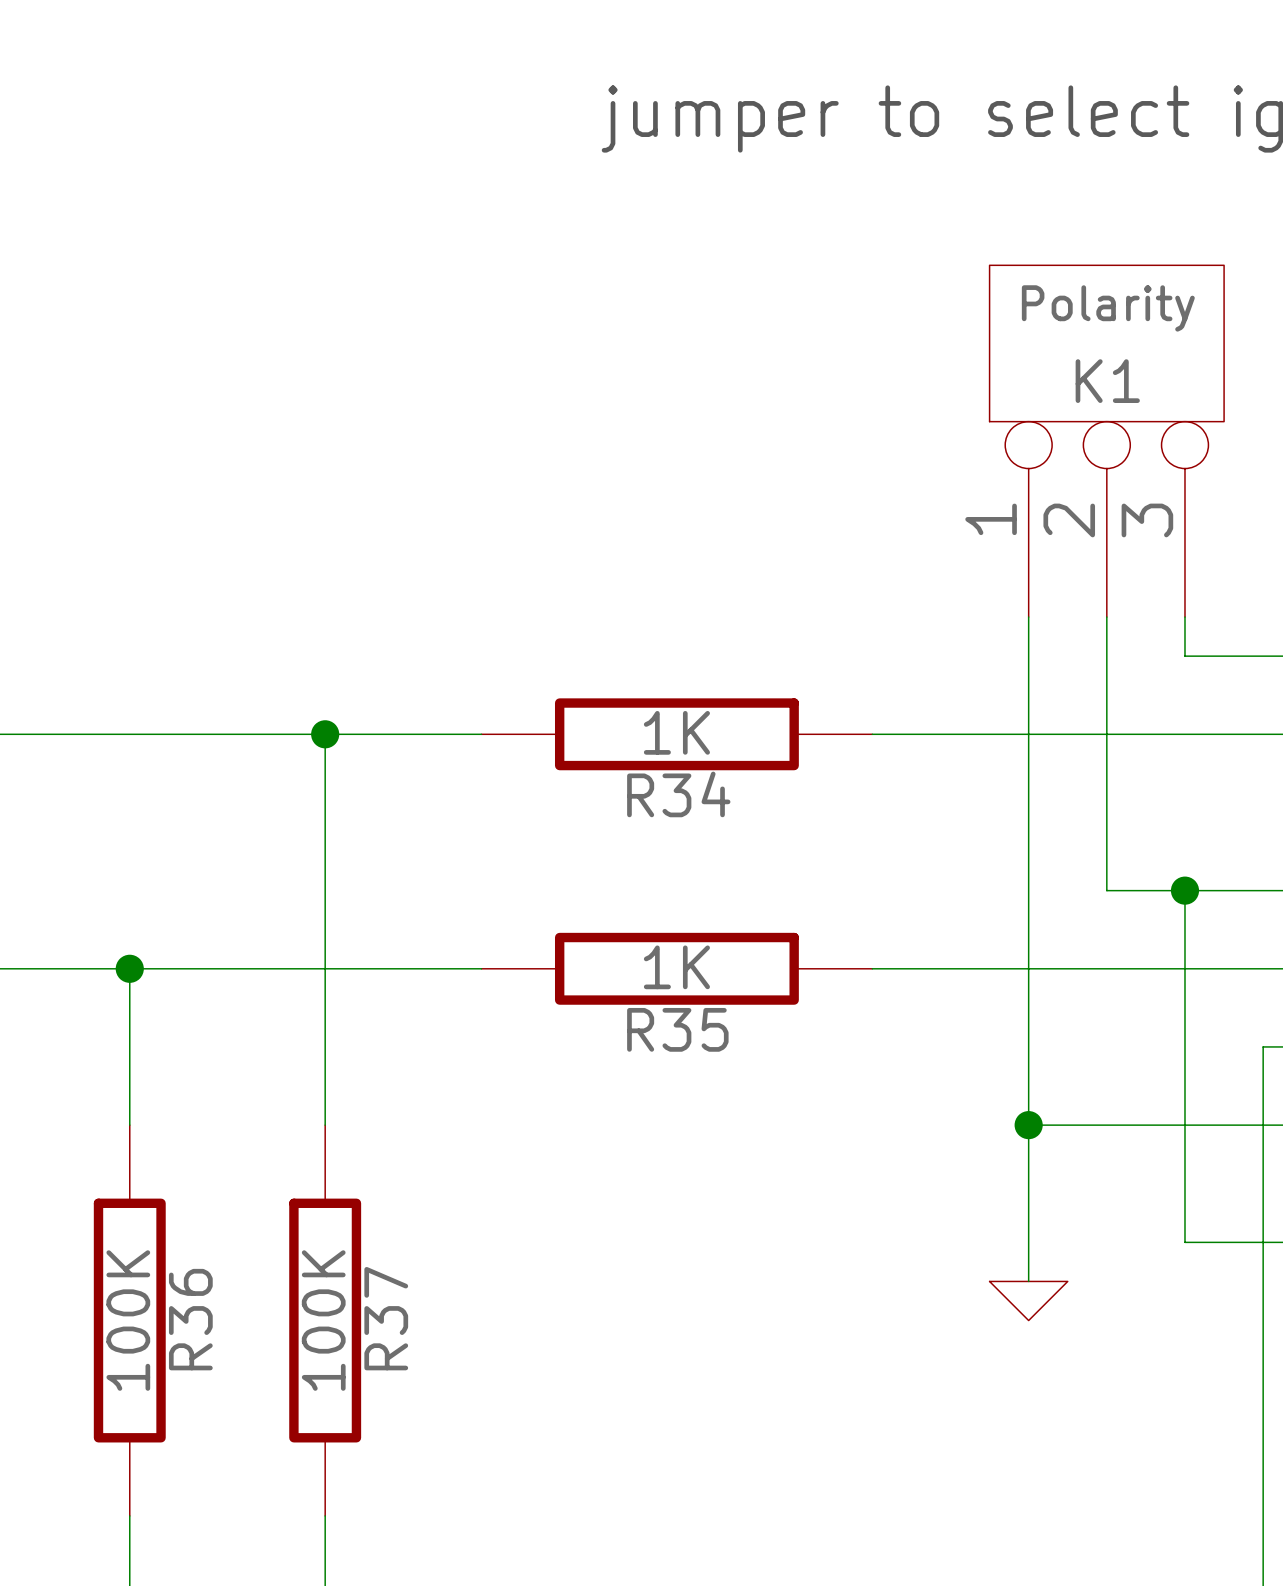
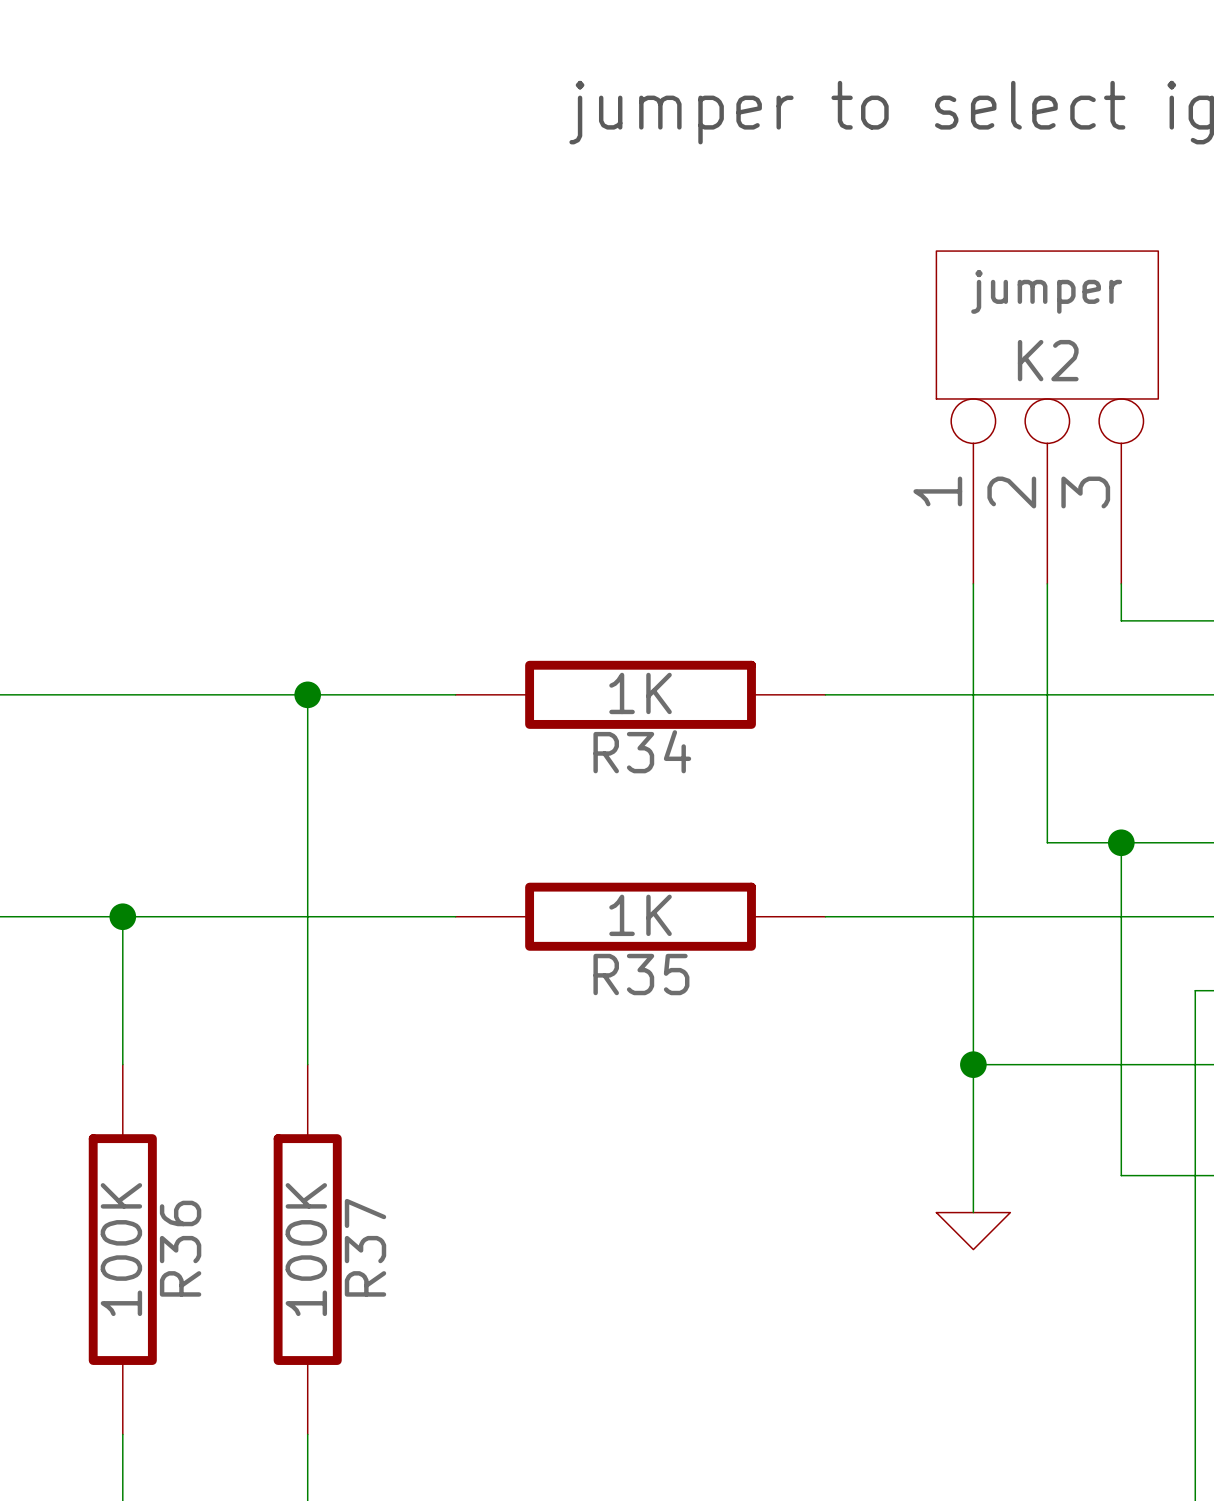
K1 value: Polarity (1108, 308) -> jumper (1046, 291)
K1 name: K1 (1107, 381) -> K2 (1048, 360)

